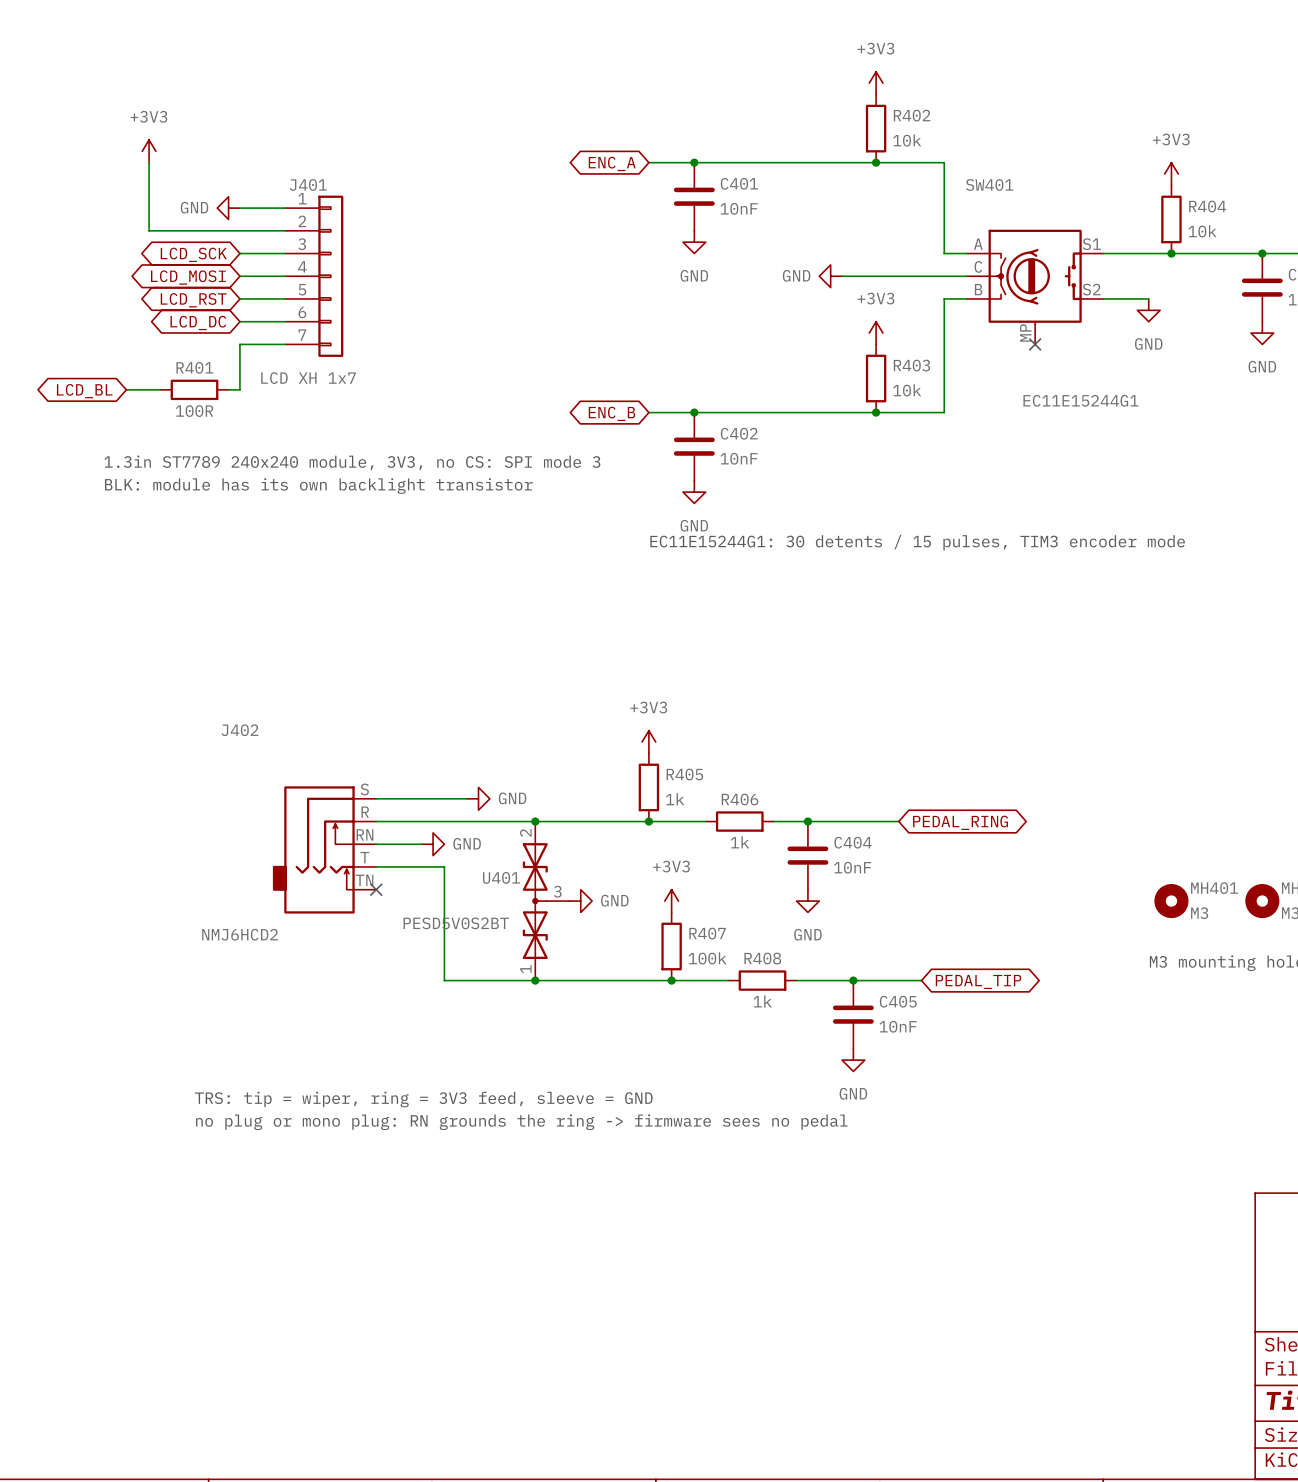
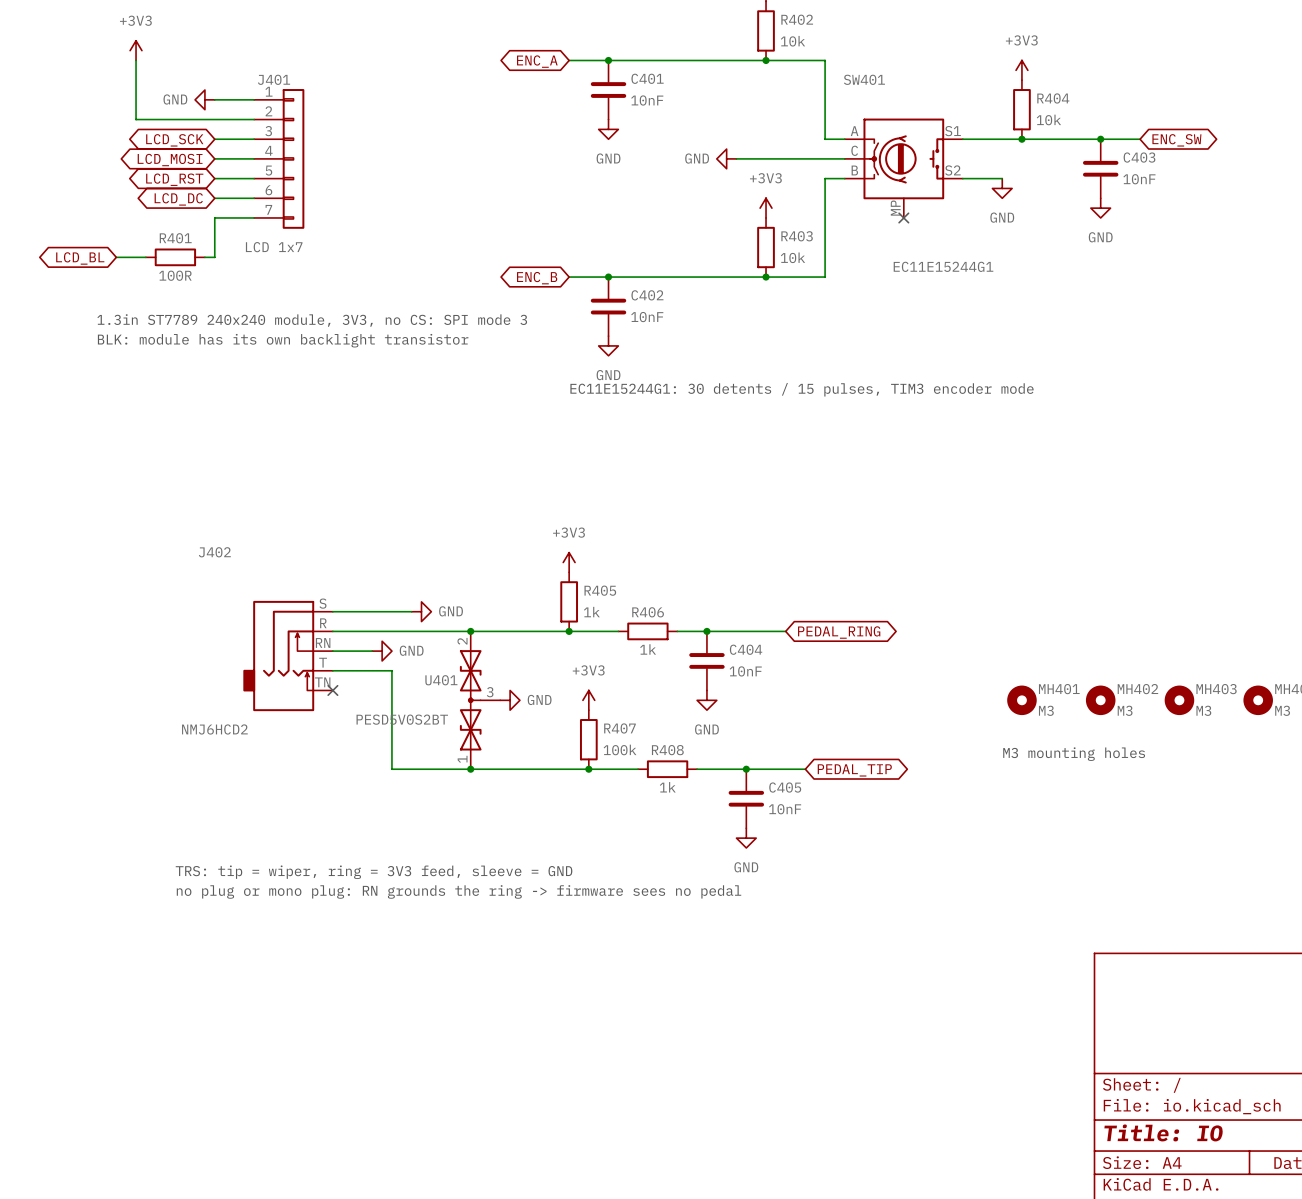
J401 value: LCD XH 1x7 (308, 378) -> LCD 1x7 (274, 247)

